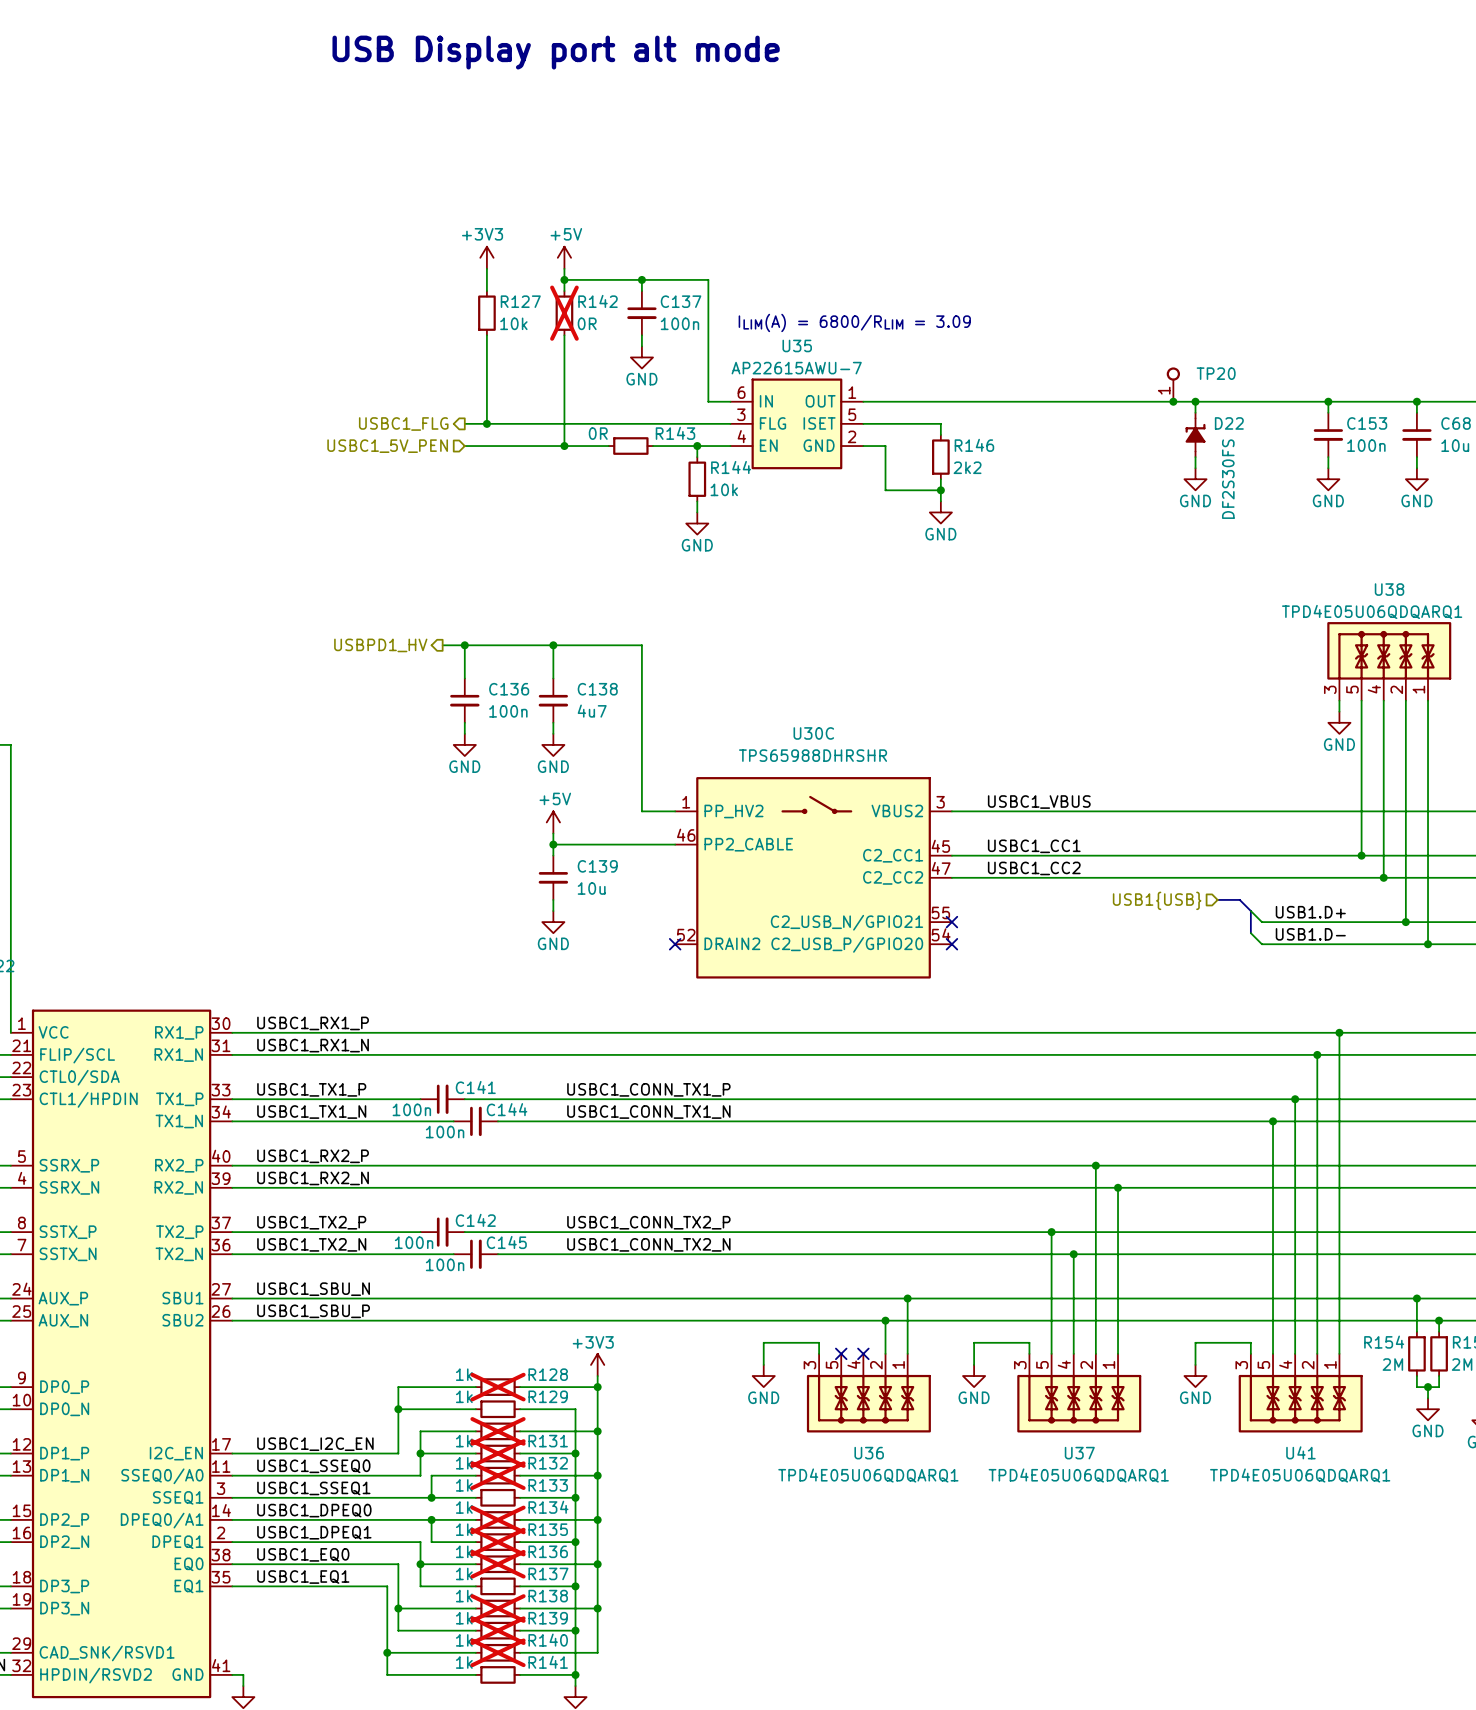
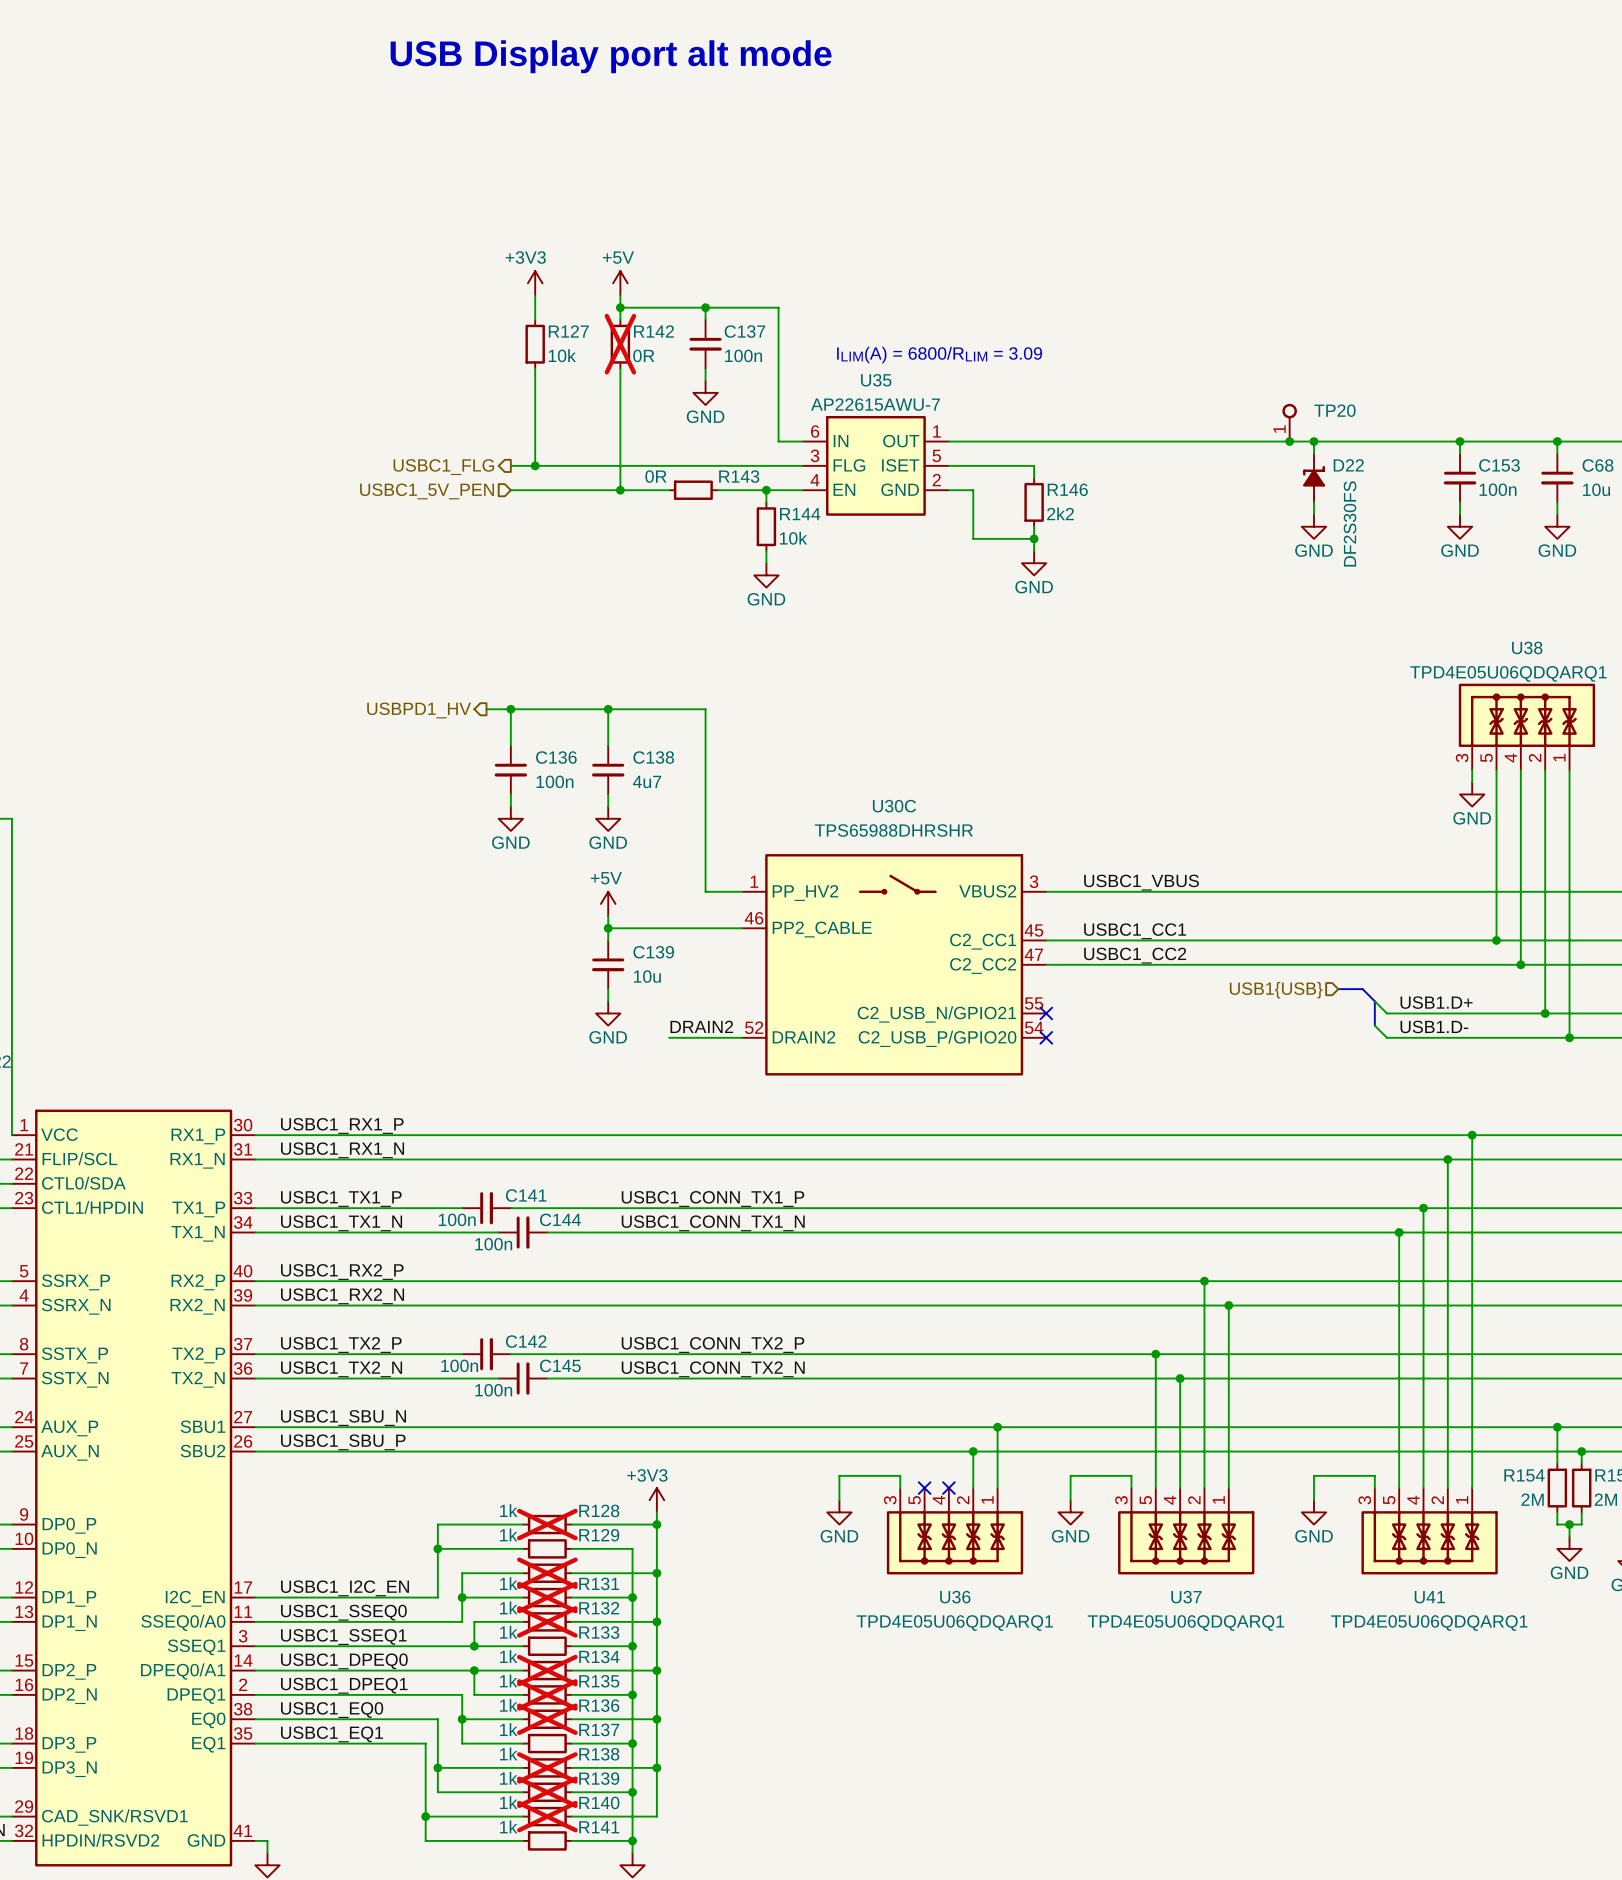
label: none -> DRAIN2 (701, 1026)
wire: none -> (669, 1037) (742, 1037)
no-connect mark: (675, 944) -> none

